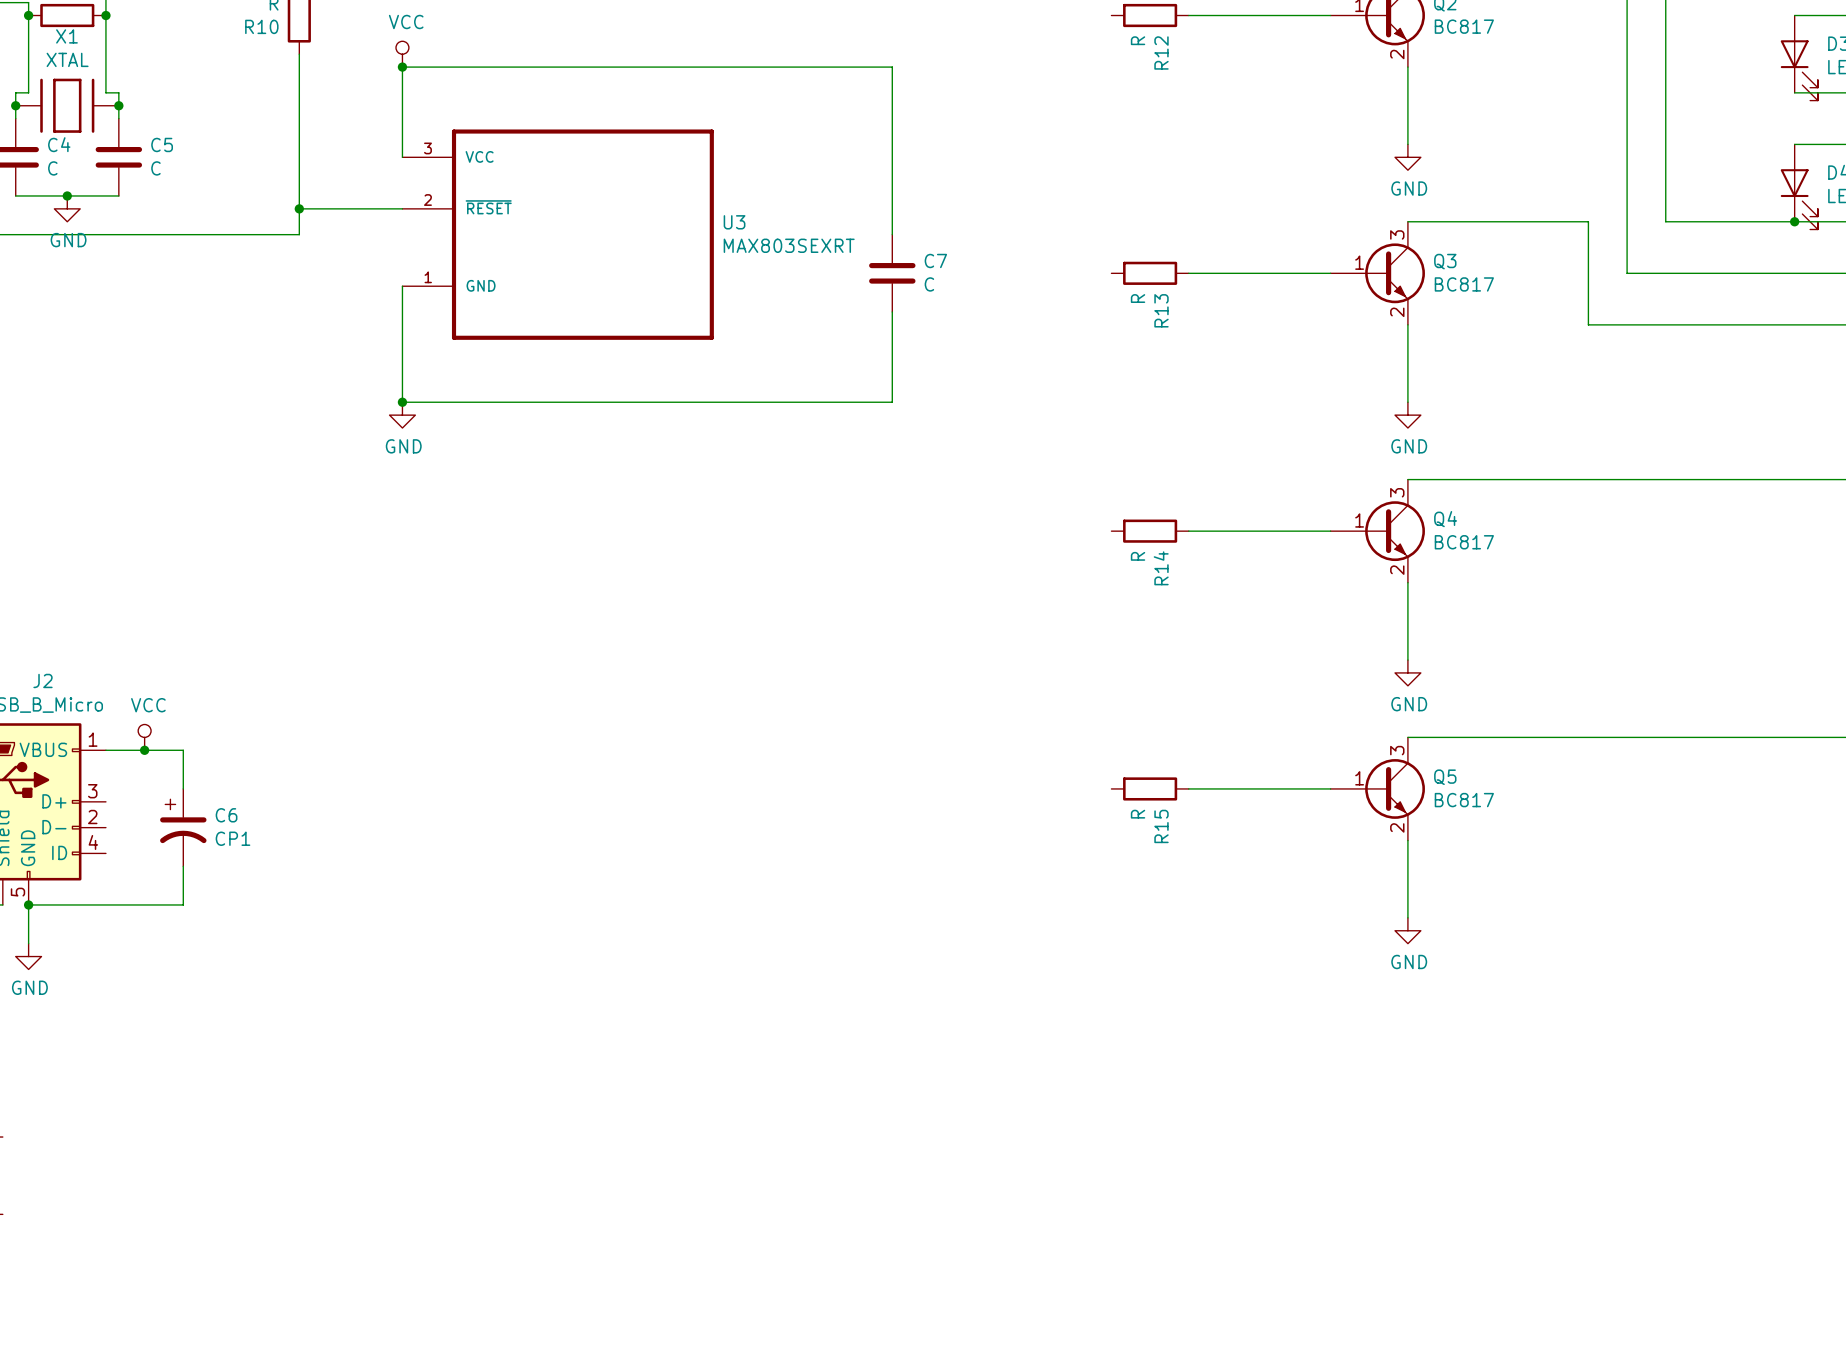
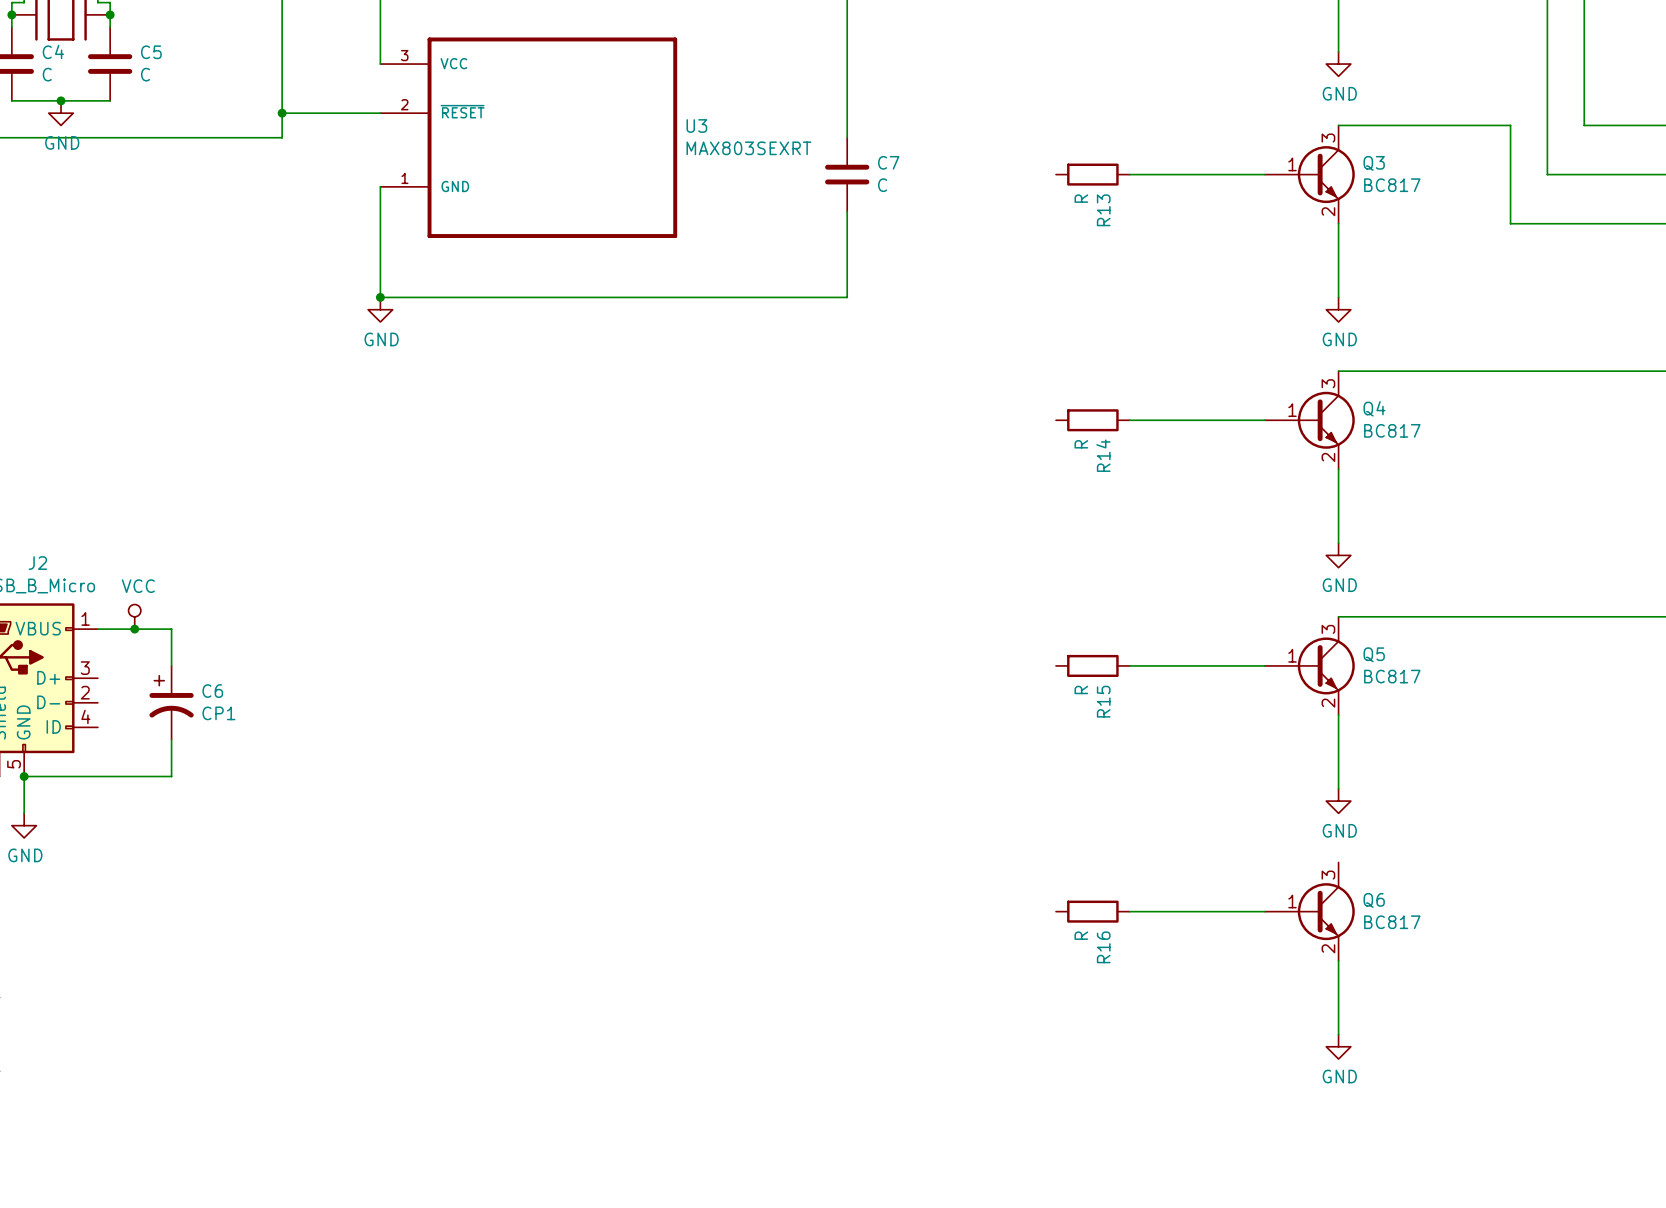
R16: none -> R (1092, 911)
wire: none -> (1129, 911) (1264, 911)
Q6: none -> BC817 (1309, 911)
wire: none -> (1338, 960) (1338, 1034)
power symbol: none -> GND (1338, 1046)

